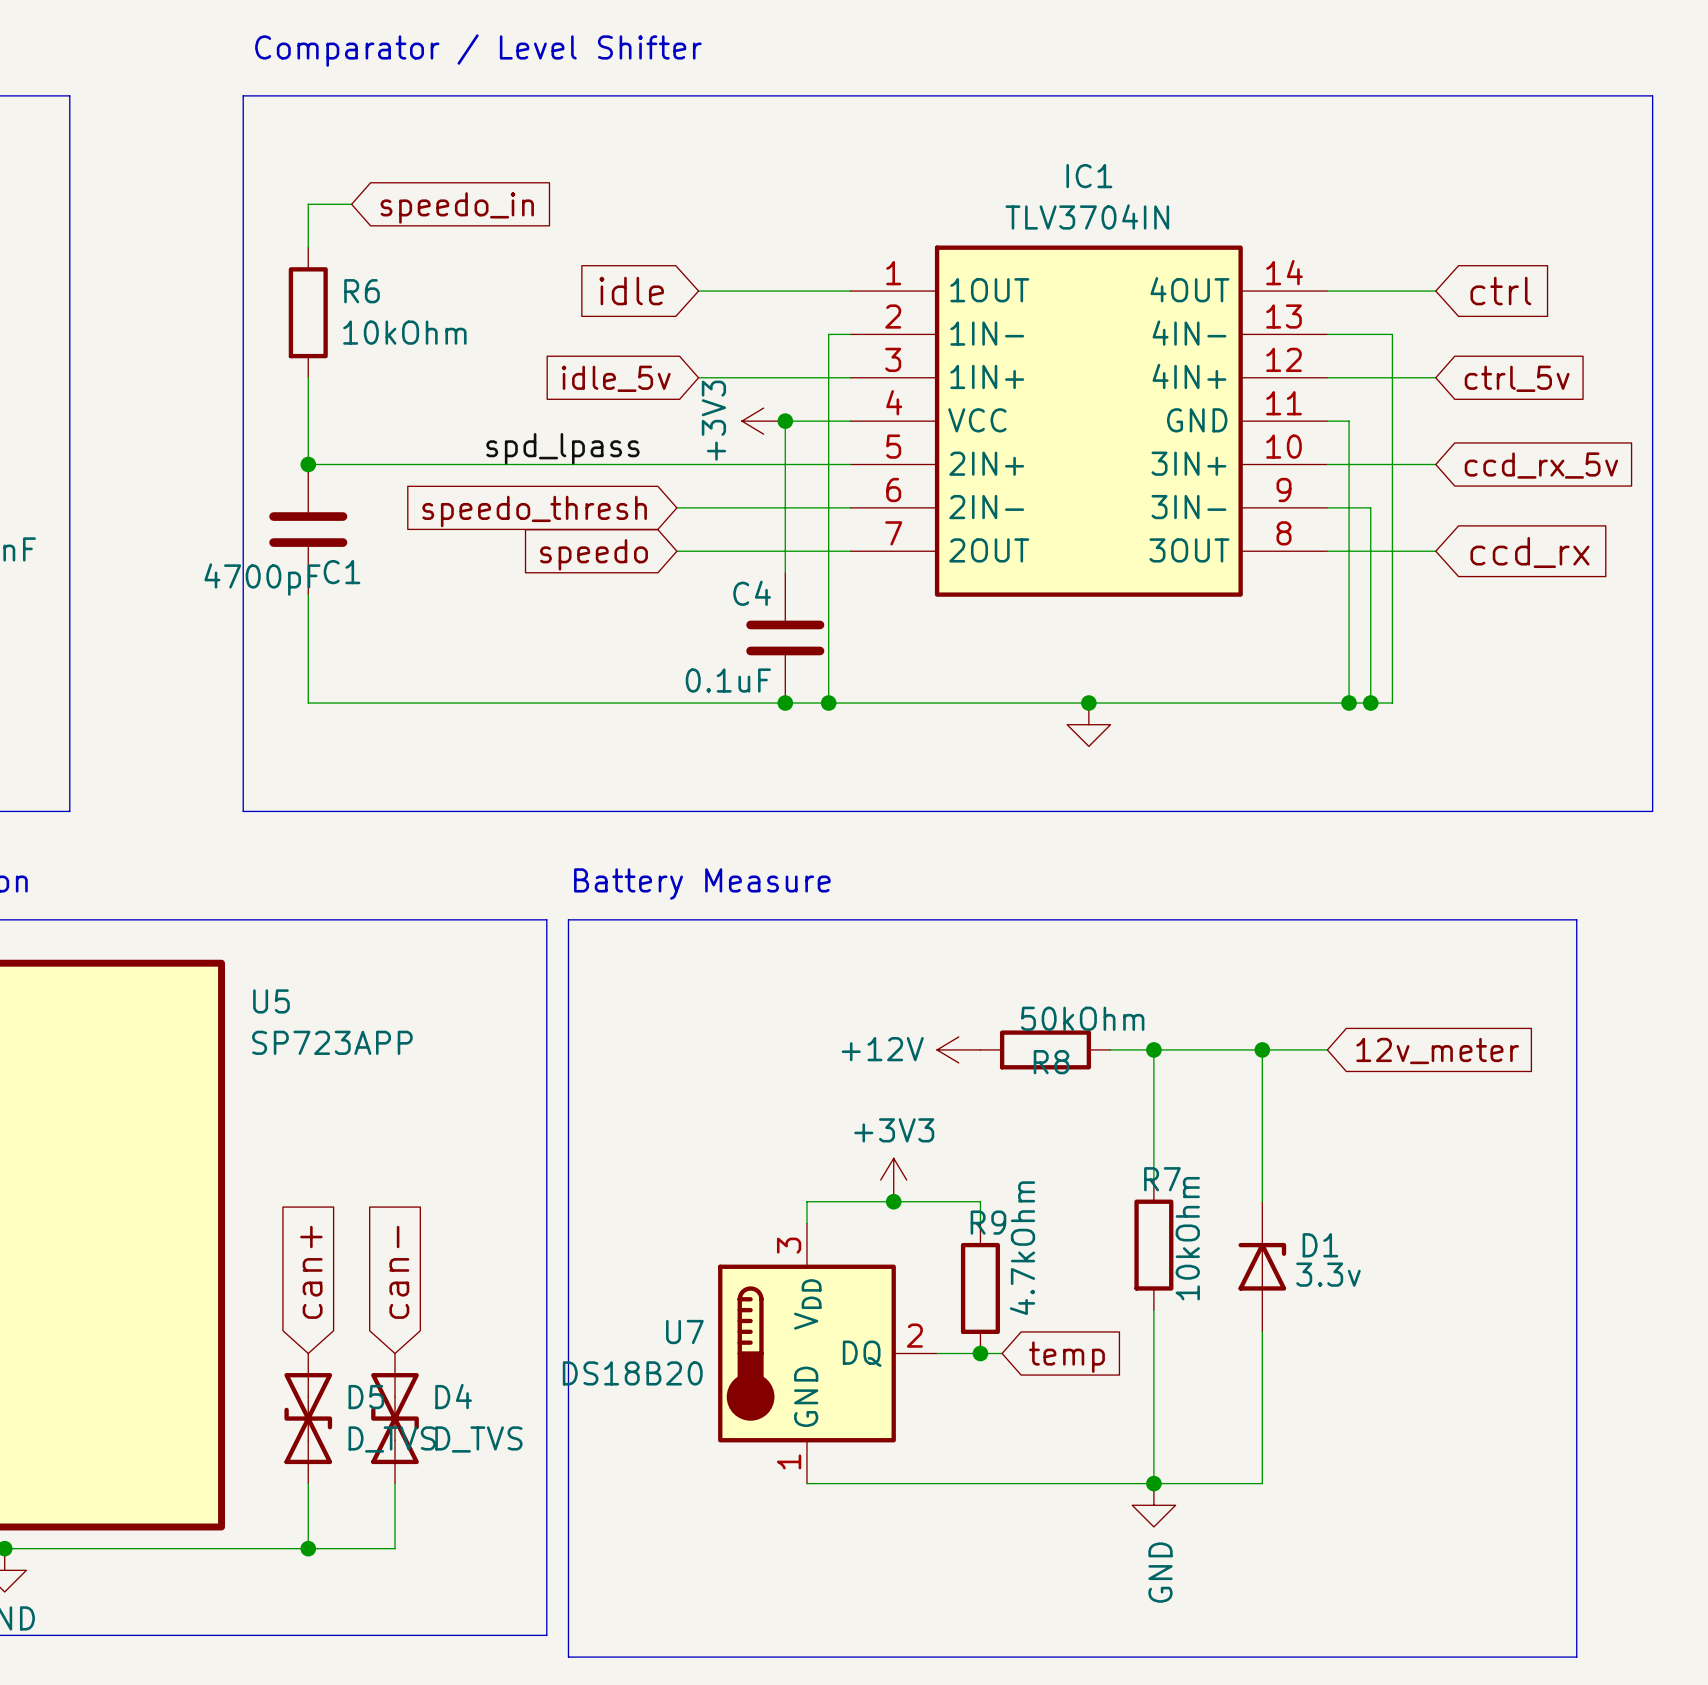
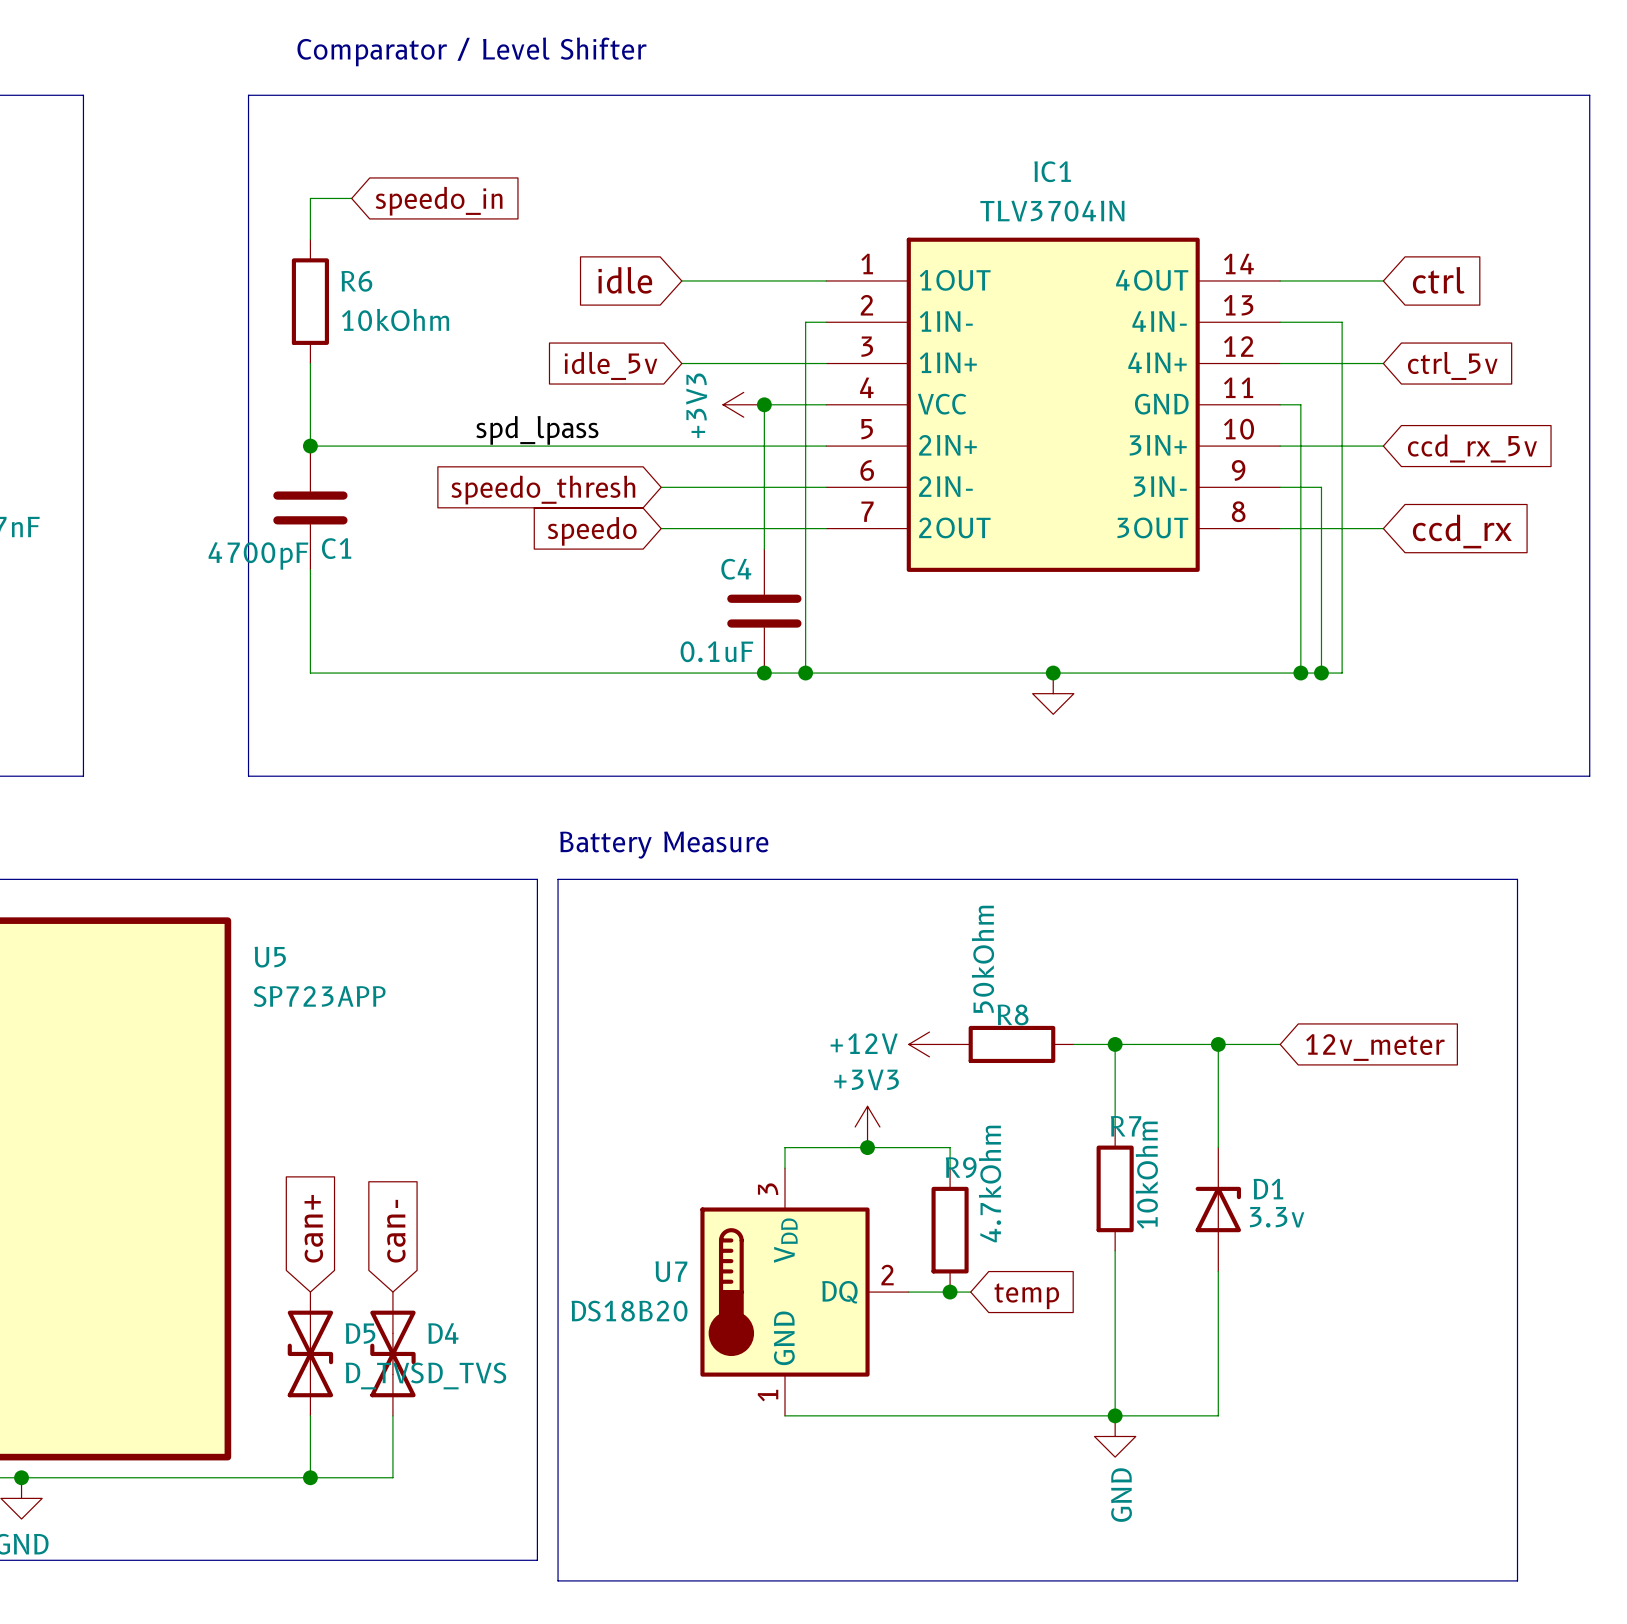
R8 value rotation: 0° (1082, 1018) -> 90° counterclockwise (982, 959)
power symbol position: +12V (958, 1049) -> +12V (929, 1044)
R8 position: (1045, 1049) -> (1011, 1044)
wire: (1110, 1049) (1327, 1049) -> (1073, 1044) (1280, 1044)
wire: (1153, 1049) (1153, 1093) -> none
junction position: (1153, 1049) -> (1115, 1044)
wire: (1262, 1049) (1262, 1093) -> none
junction position: (1262, 1049) -> (1218, 1044)
global label position: 12v_meter (1437, 1050) -> 12v_meter (1375, 1047)

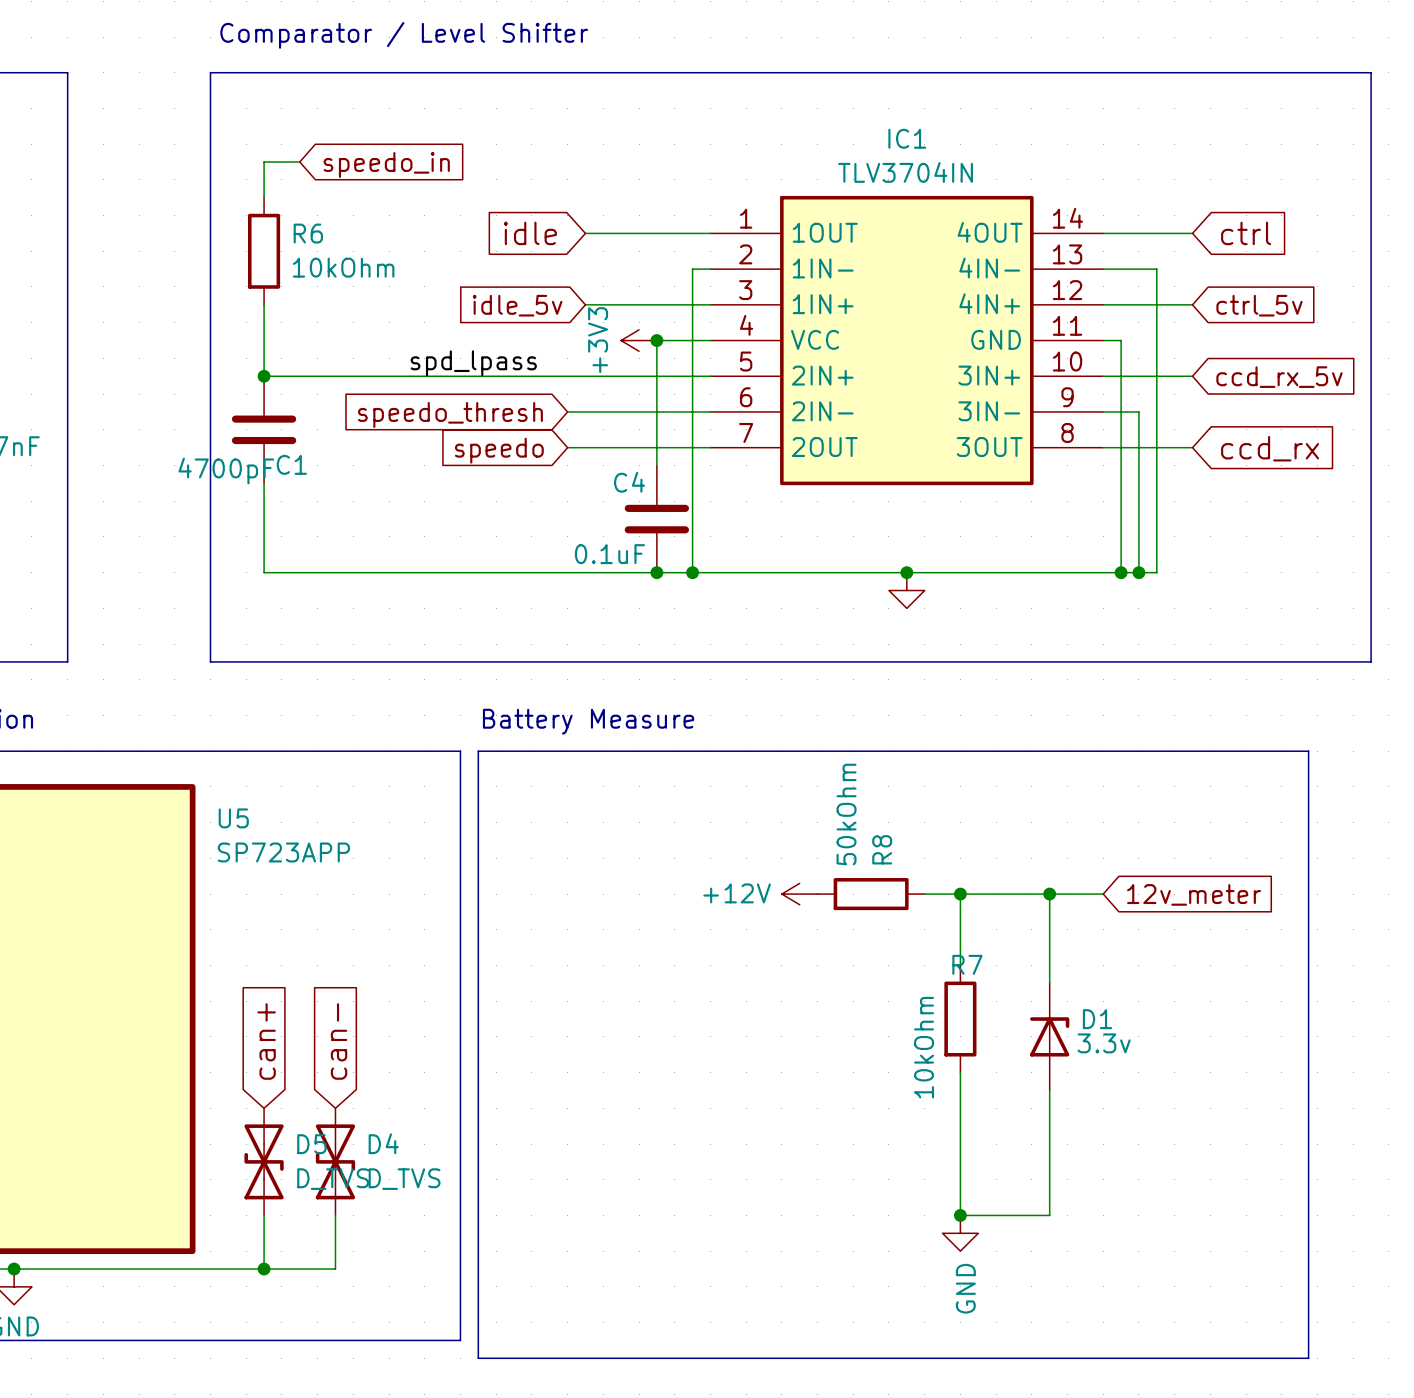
R8 name rotation: 0° (1013, 1014) -> 90° counterclockwise (882, 849)
power symbol: +3V3 (867, 1126) -> none
junction: (867, 1147) -> none
wire: (785, 1168) (785, 1147) (950, 1147) (950, 1168) -> none
R7 value position: 10kOhm (1146, 1175) -> 10kOhm (924, 1047)
R9: 4.7kOhm (950, 1230) -> none
U7: DS18B20 (804, 1292) -> none
wire: (908, 1292) (970, 1292) -> none
junction: (950, 1292) -> none
global label: temp (1026, 1296) -> none
wire: (785, 1415) (1115, 1415) -> none

